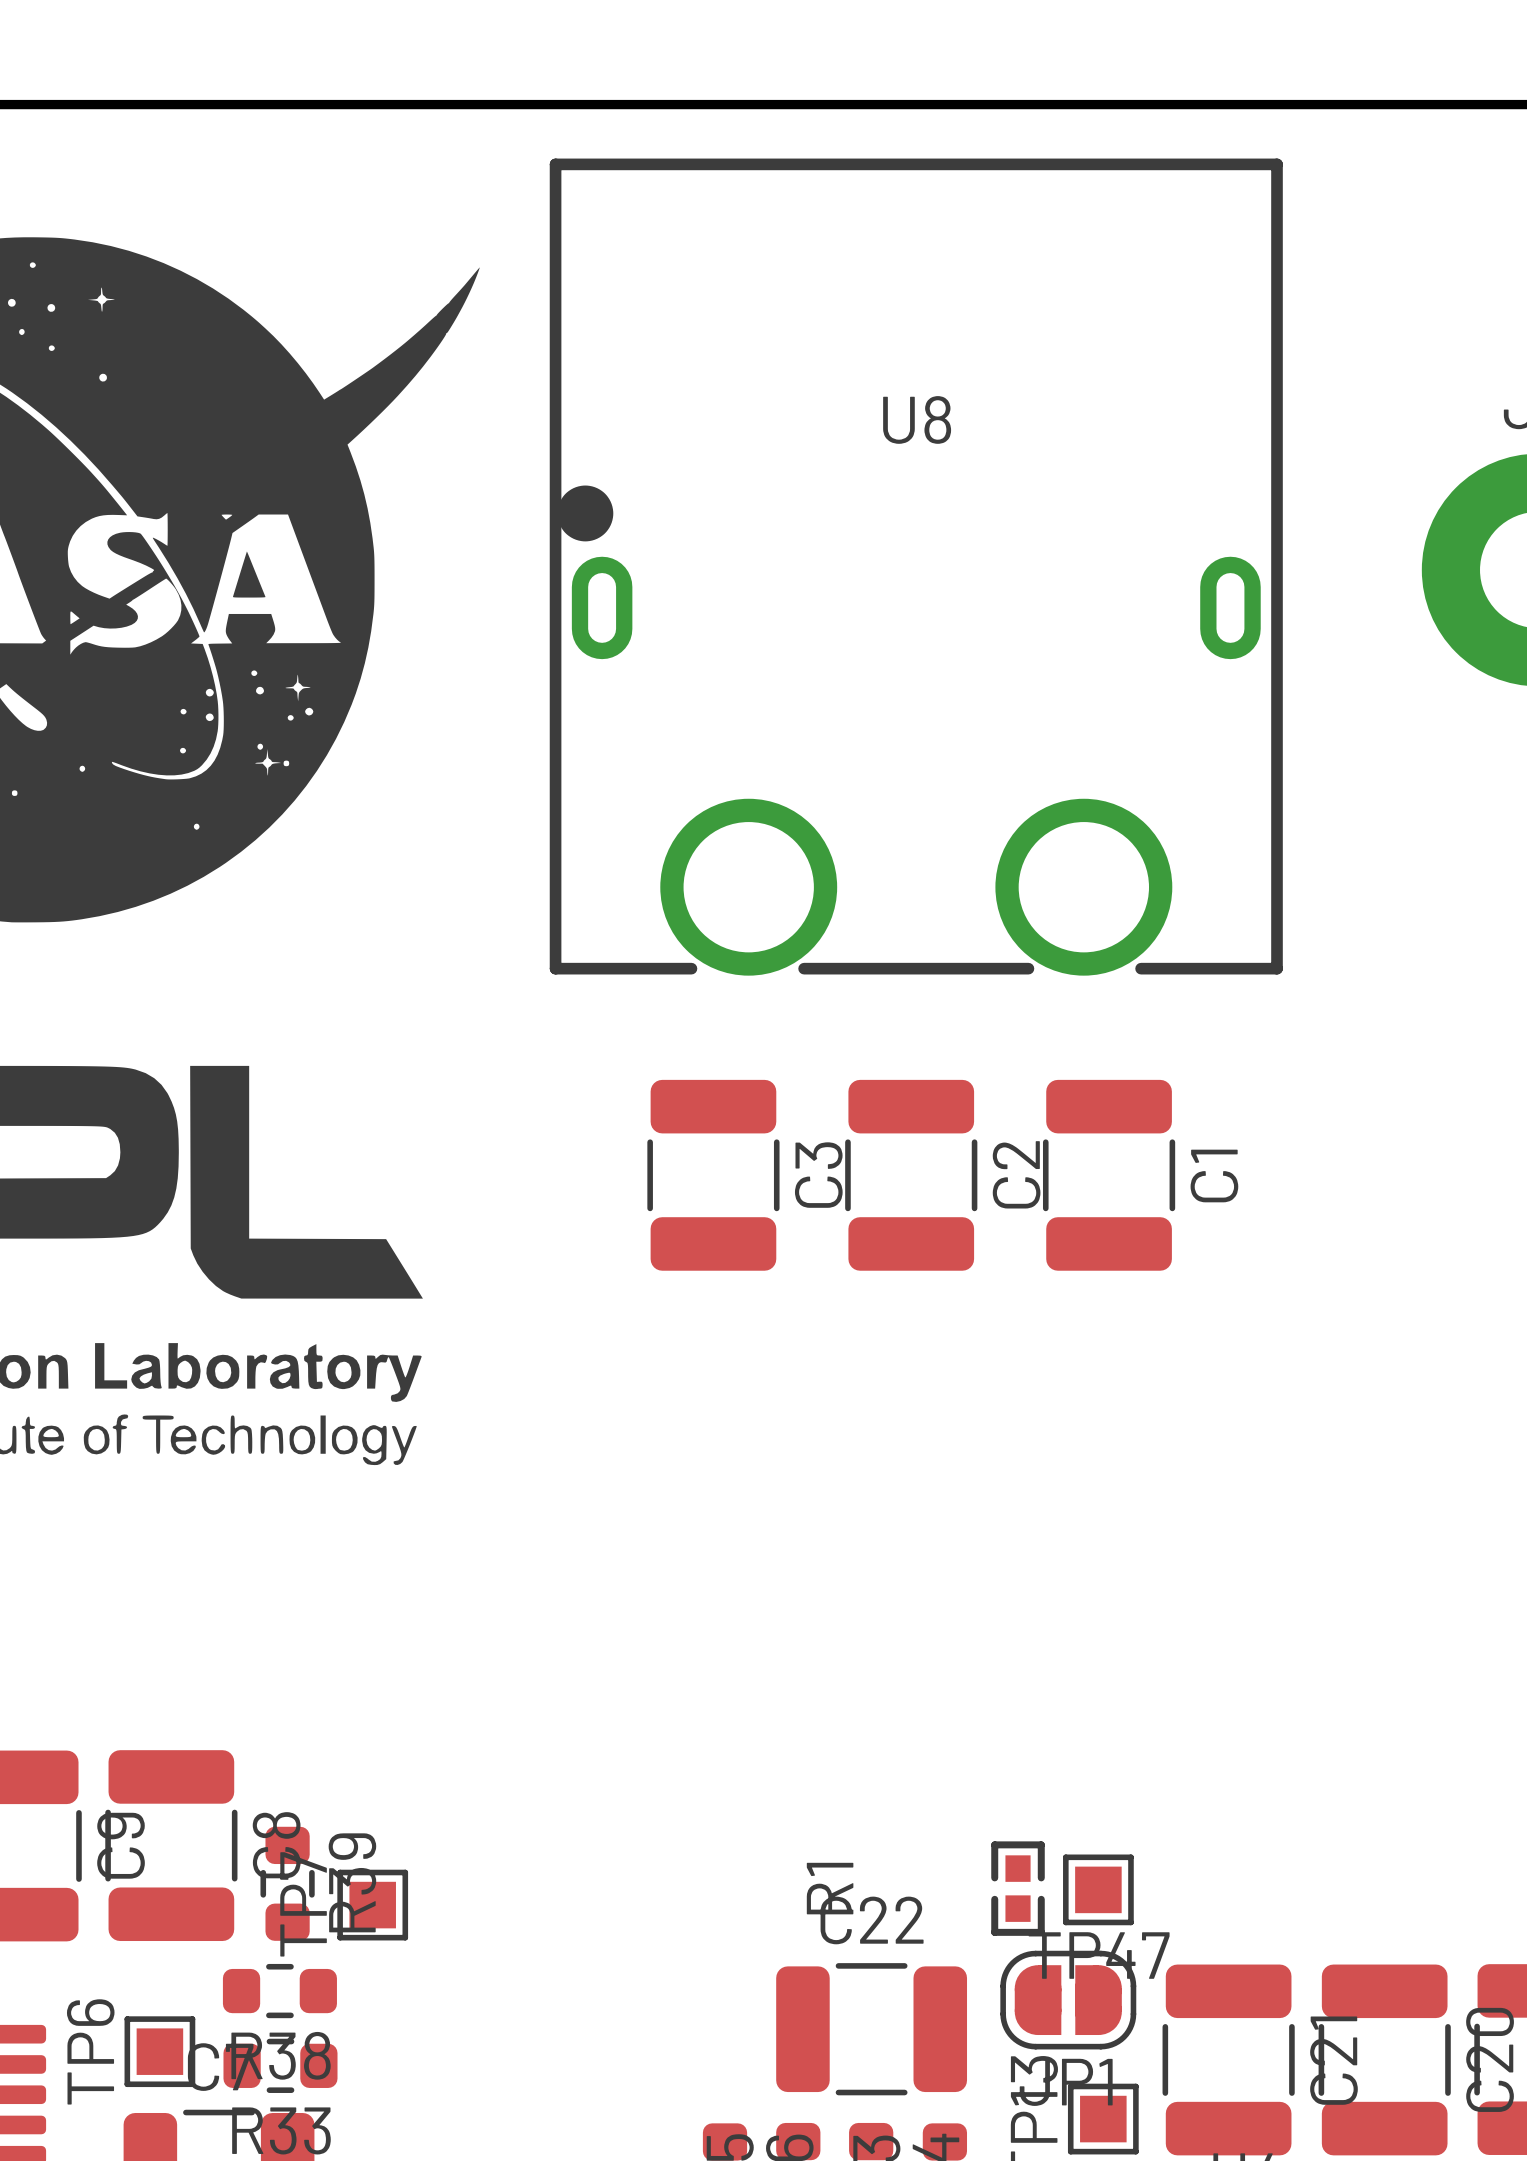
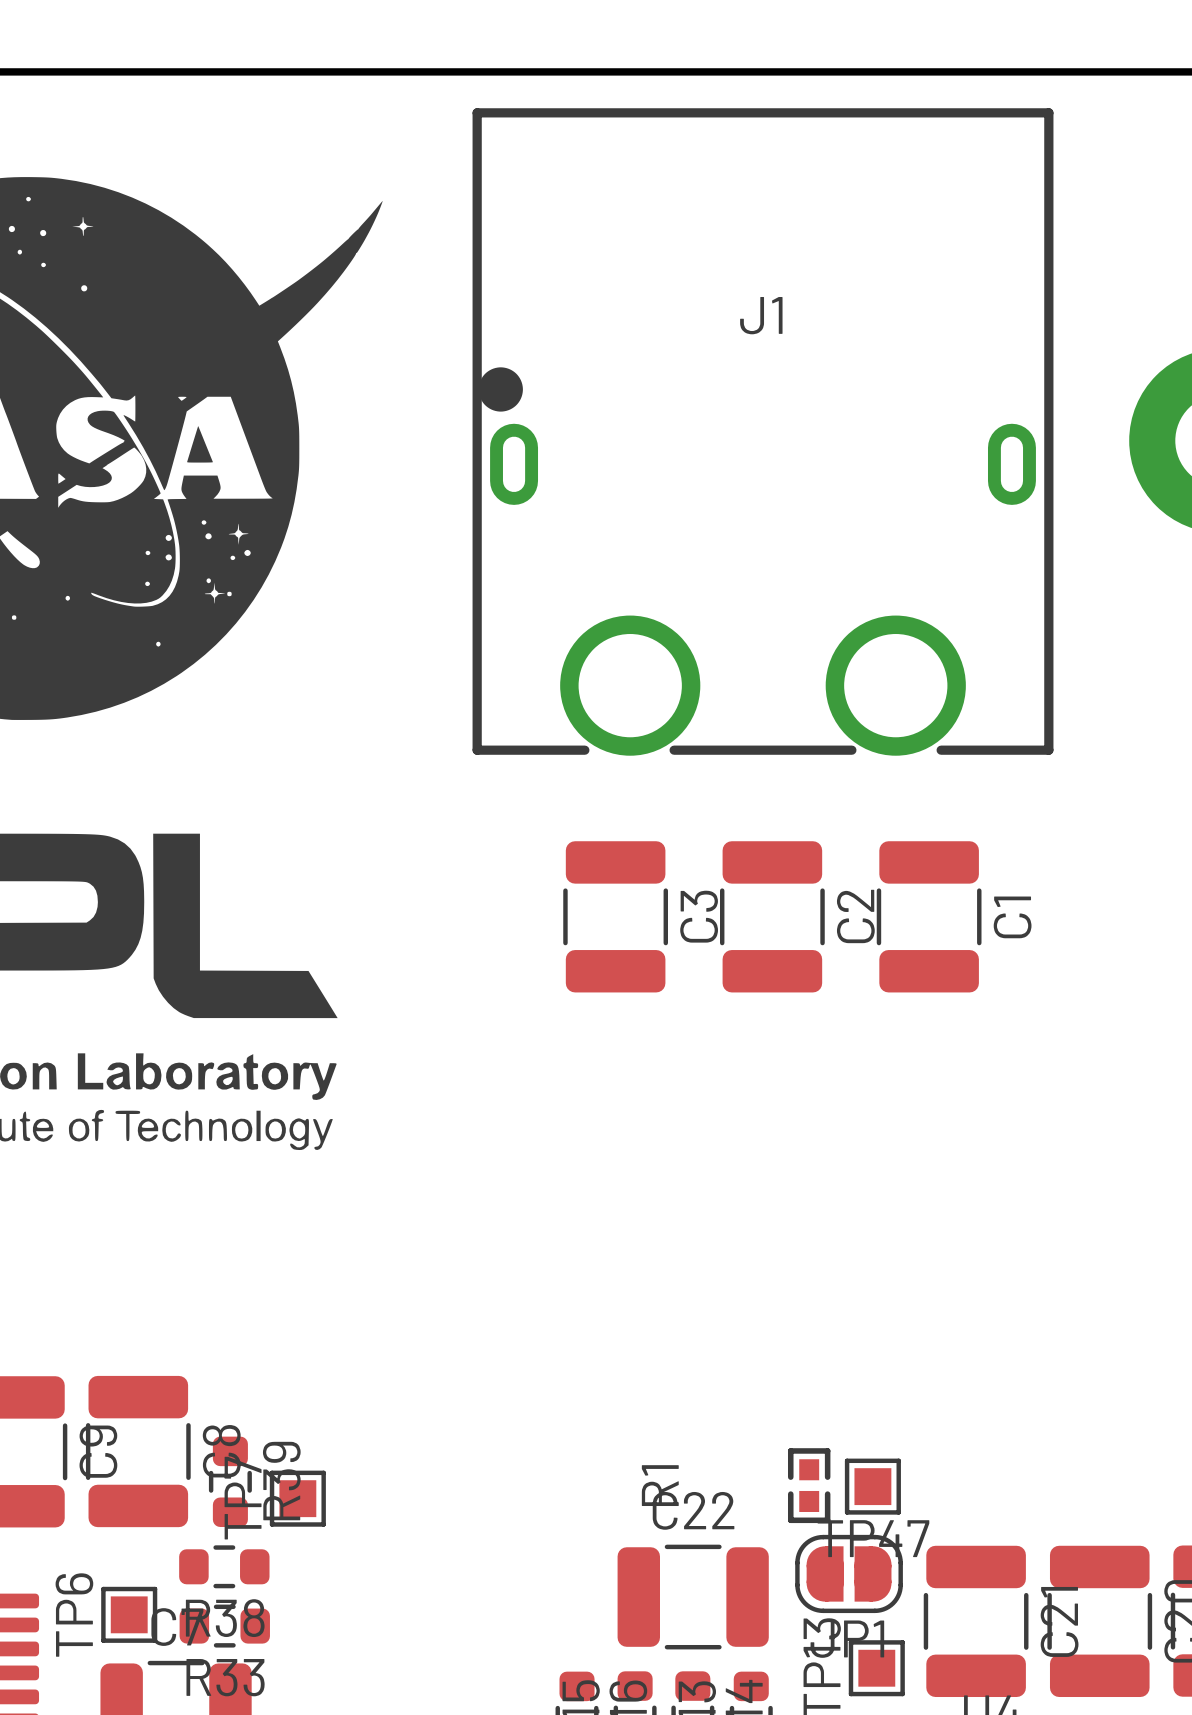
U8 name: U8 (917, 419) -> J1 (761, 315)
U8 position: (916, 567) -> (763, 431)
C3 position: (713, 1175) -> (615, 916)
C2 position: (911, 1175) -> (772, 916)
C1 position: (1109, 1175) -> (929, 916)

